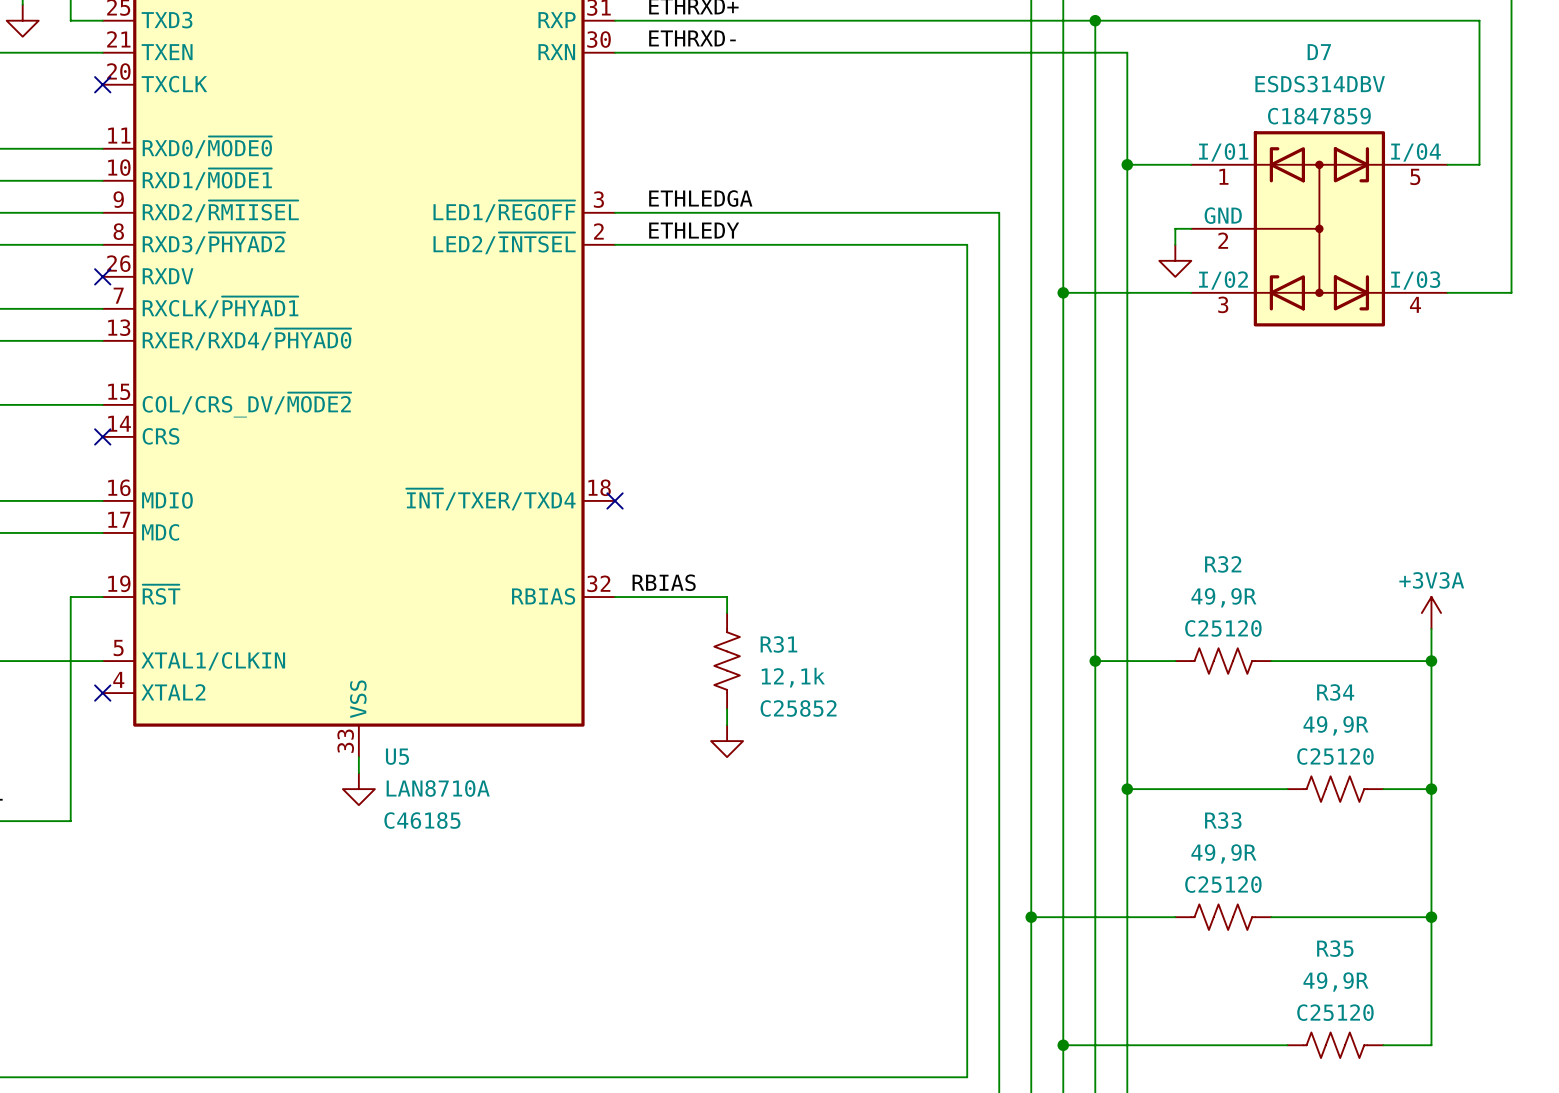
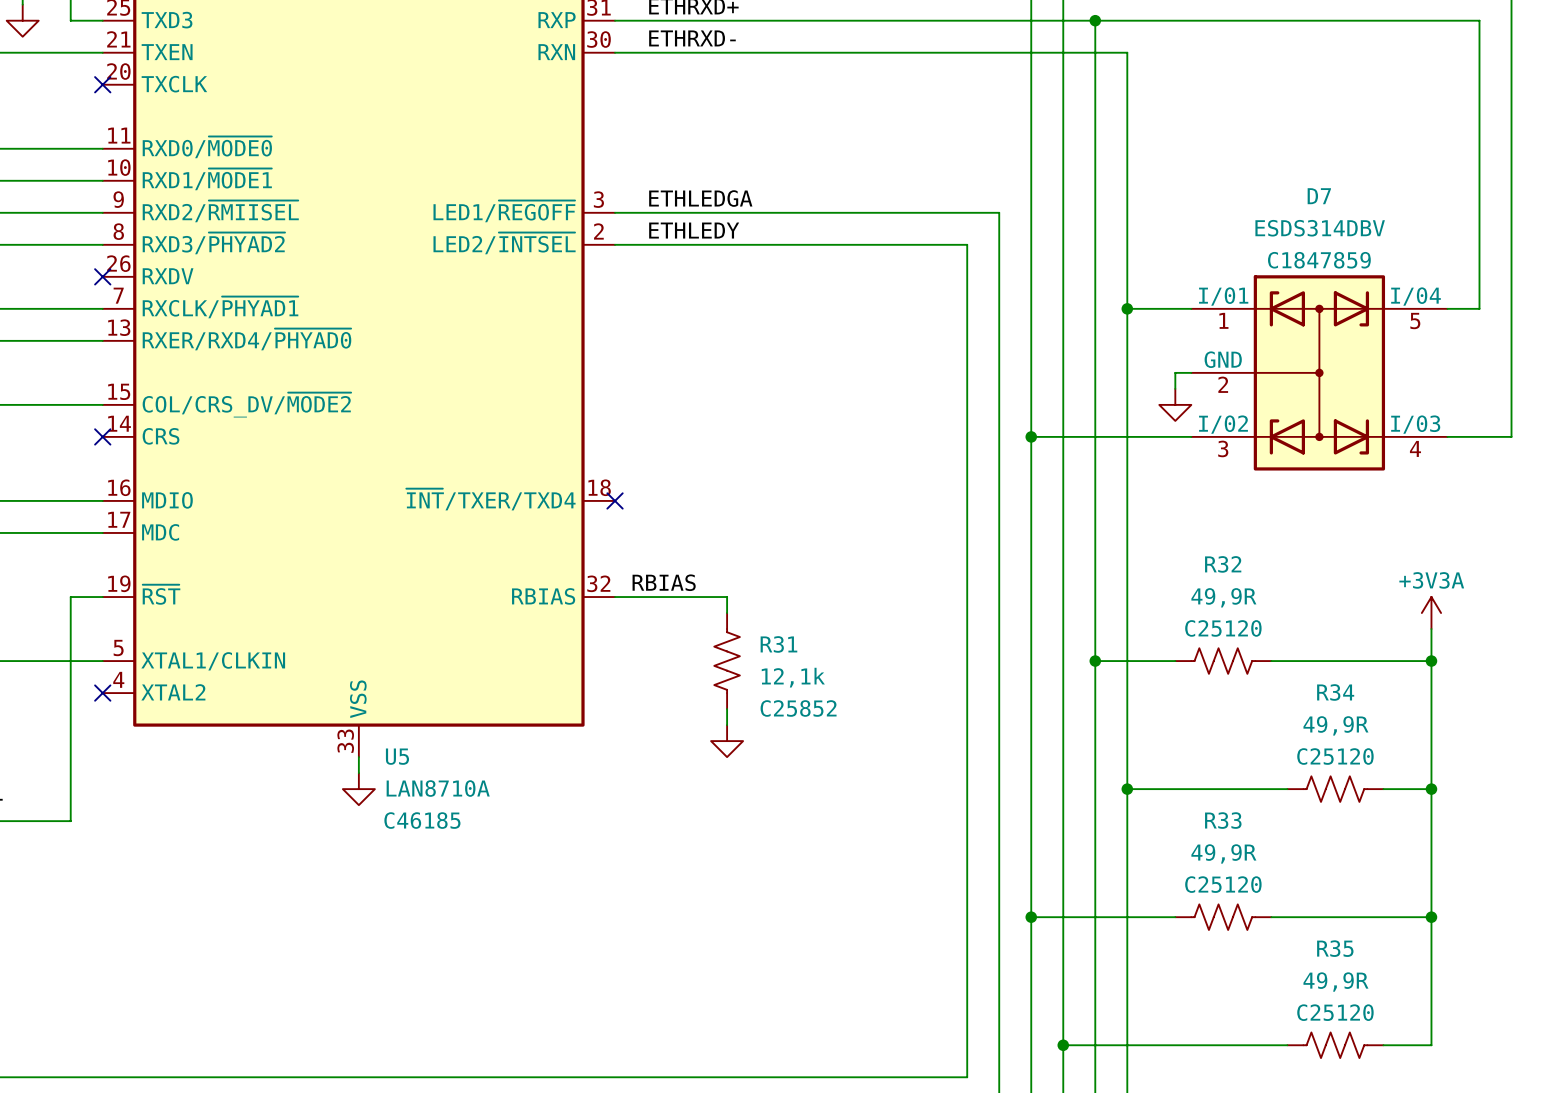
wire: (1127, 164) (1191, 164) -> (1127, 308) (1191, 308)
junction: (1127, 164) -> none
wire: (1447, 164) (1479, 164) -> (1447, 308) (1479, 308) (1479, 164)
wire: (1191, 228) (1175, 228) (1175, 244) -> (1191, 372) (1175, 372) (1175, 388)
D7 position: (1319, 228) -> (1319, 372)
power symbol position: (1175, 260) -> (1175, 404)
wire: (1063, 292) (1191, 292) -> none
junction position: (1063, 292) -> (1127, 308)
wire: (1447, 292) (1511, 292) -> (1447, 436) (1511, 436) (1511, 292)
wire: none -> (1031, 436) (1191, 436)
junction: none -> (1031, 436)

